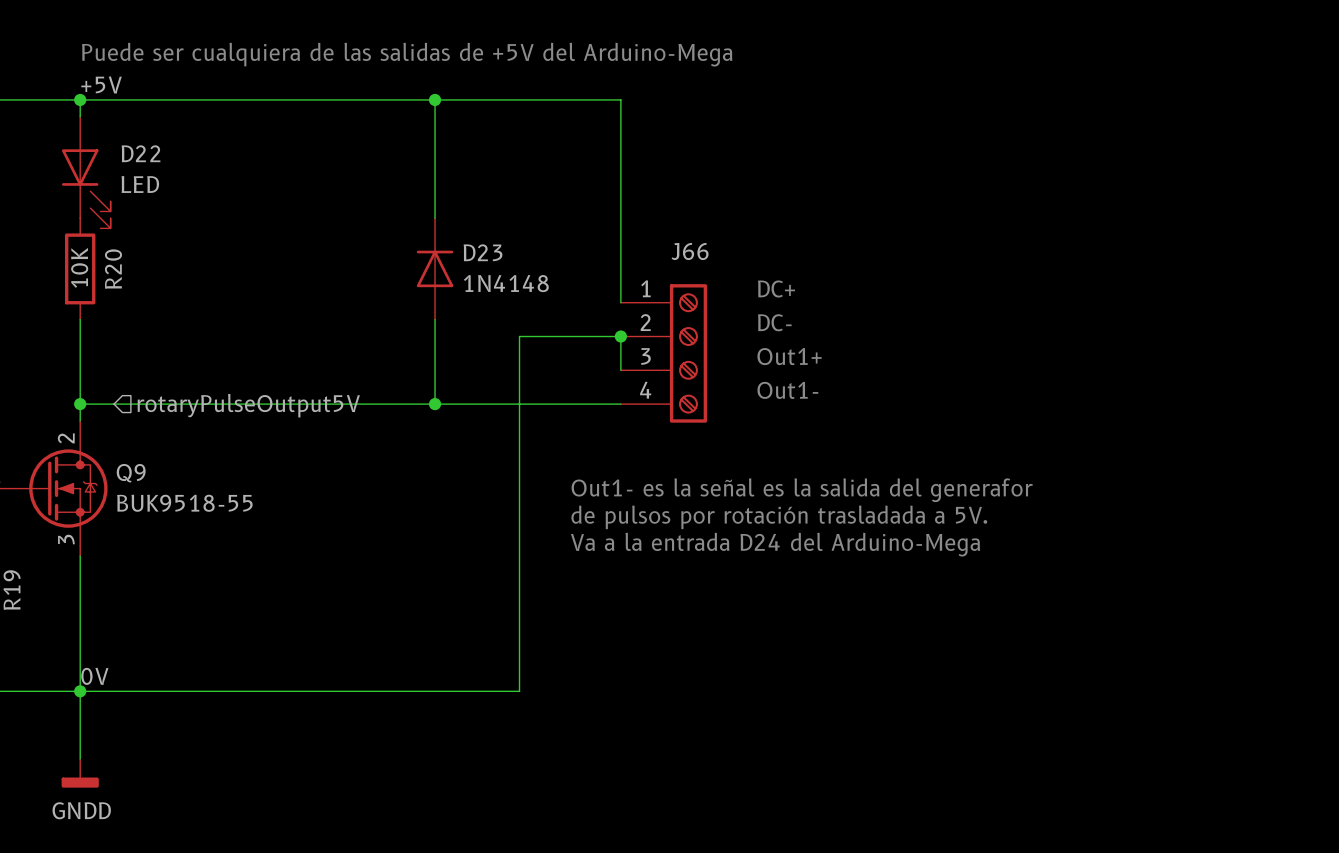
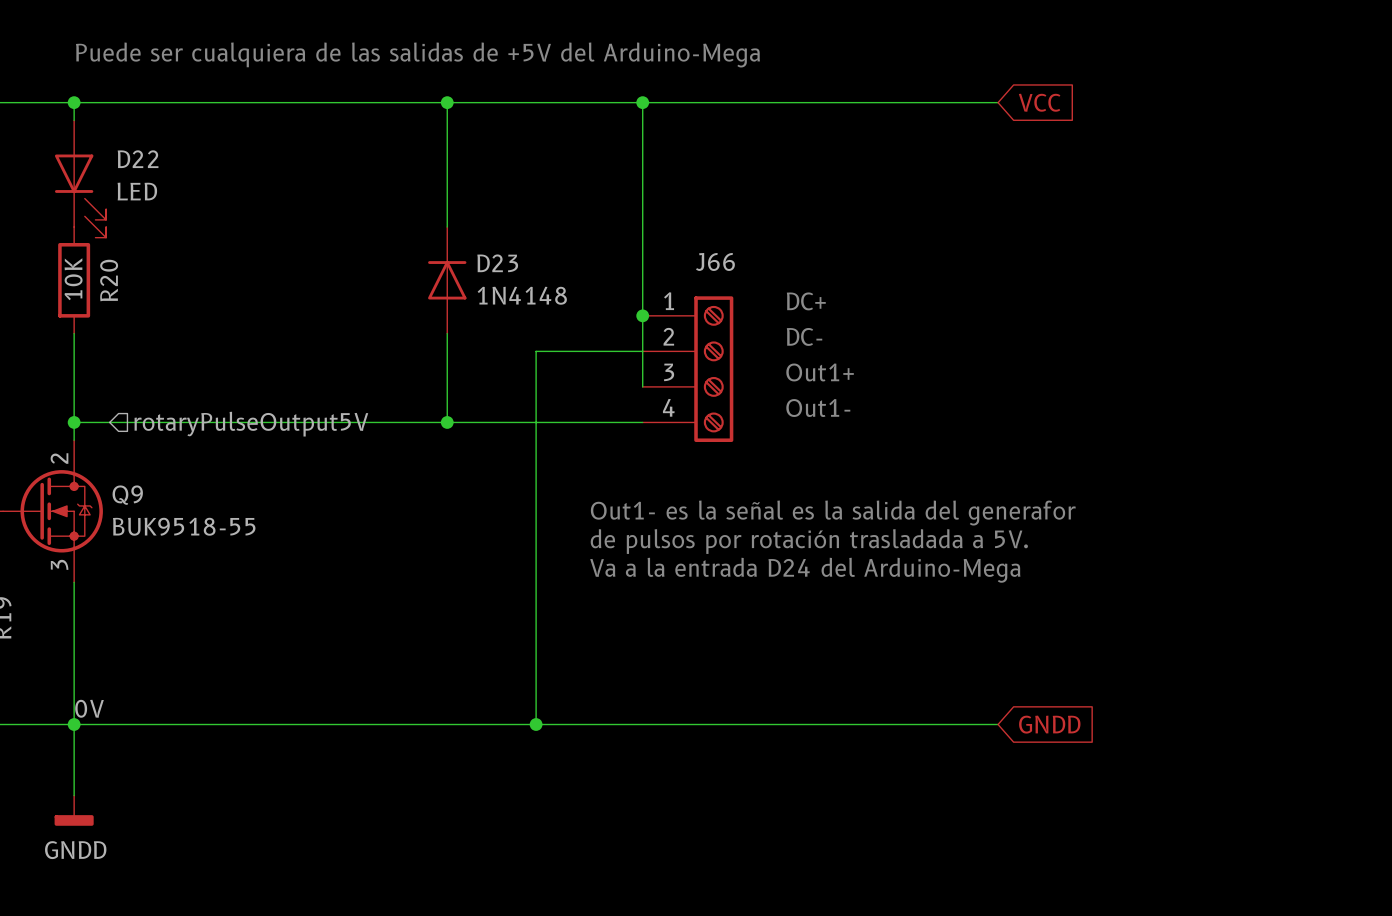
label: +5V (101, 85) -> none
wire: none -> (642, 102) (998, 102)
junction: none -> (642, 102)
global label: none -> VCC (1039, 102)
wire: none -> (642, 315) (642, 351)
junction position: (620, 336) -> (642, 315)
wire: none -> (536, 724) (998, 724)
junction: none -> (536, 724)
global label: none -> GNDD (1049, 724)

